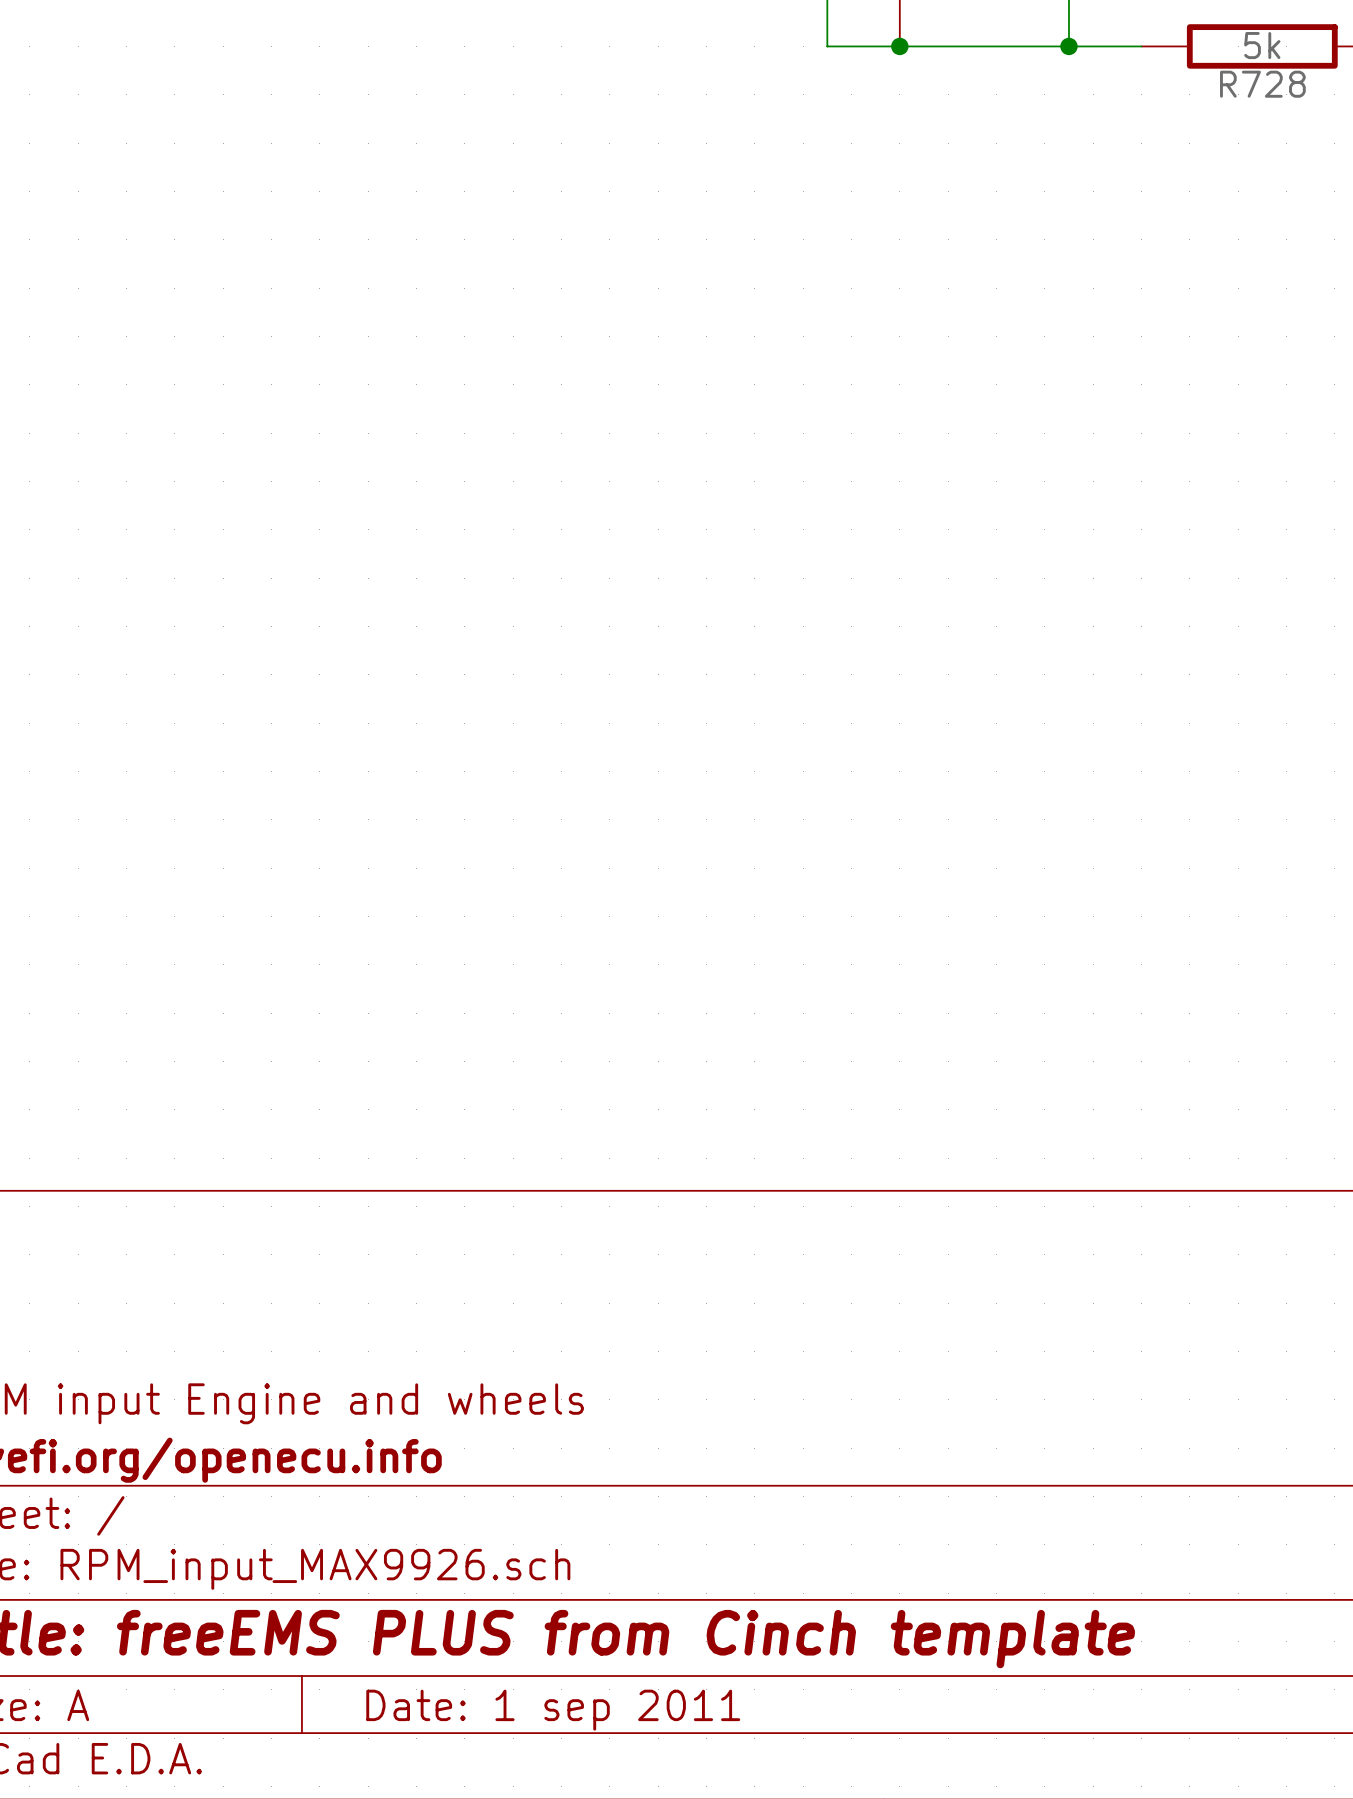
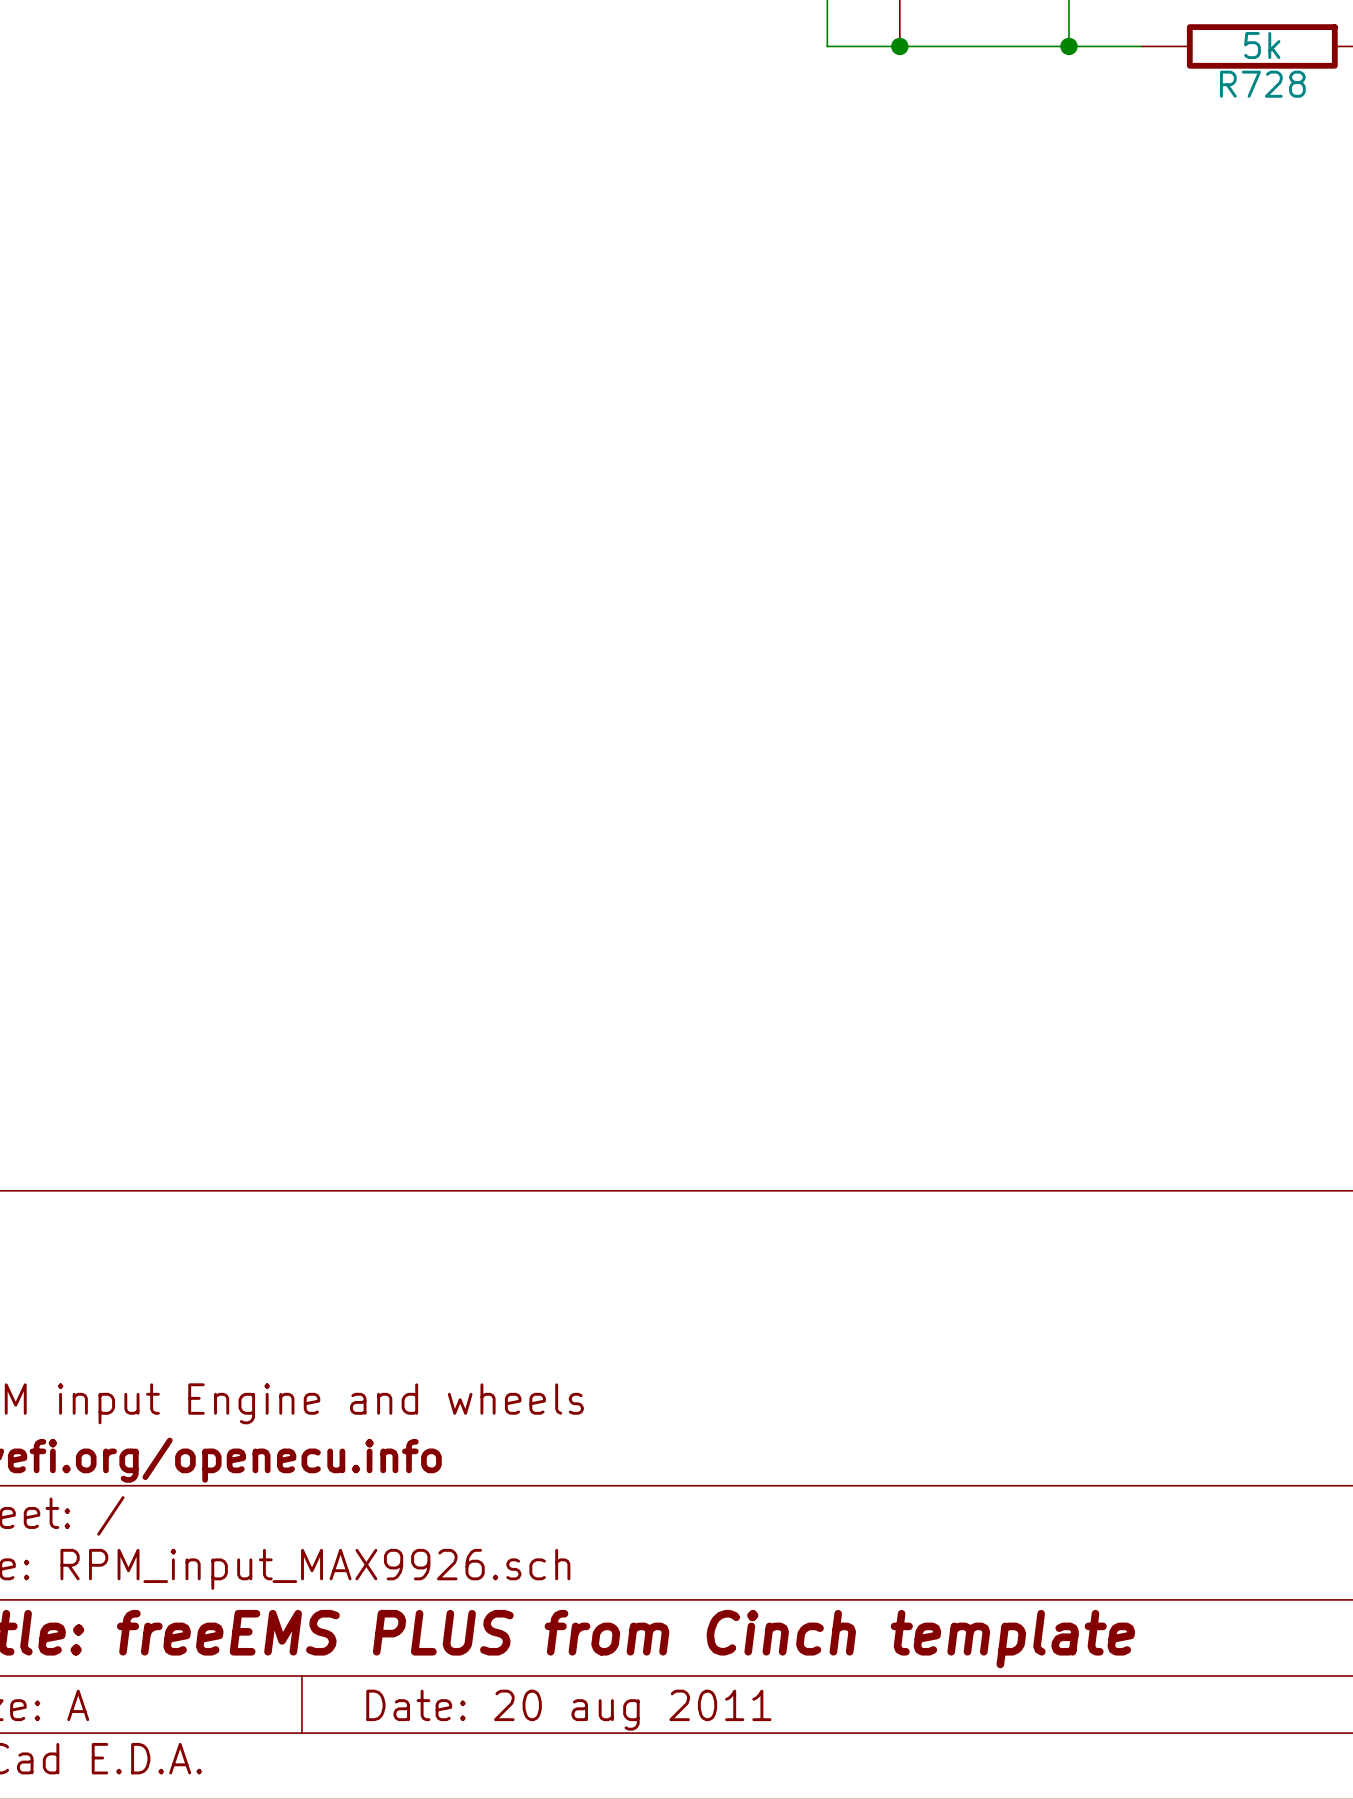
title block: Date: 1 sep 2011 (553, 1710) -> Date: 20 aug 2011 (568, 1710)

